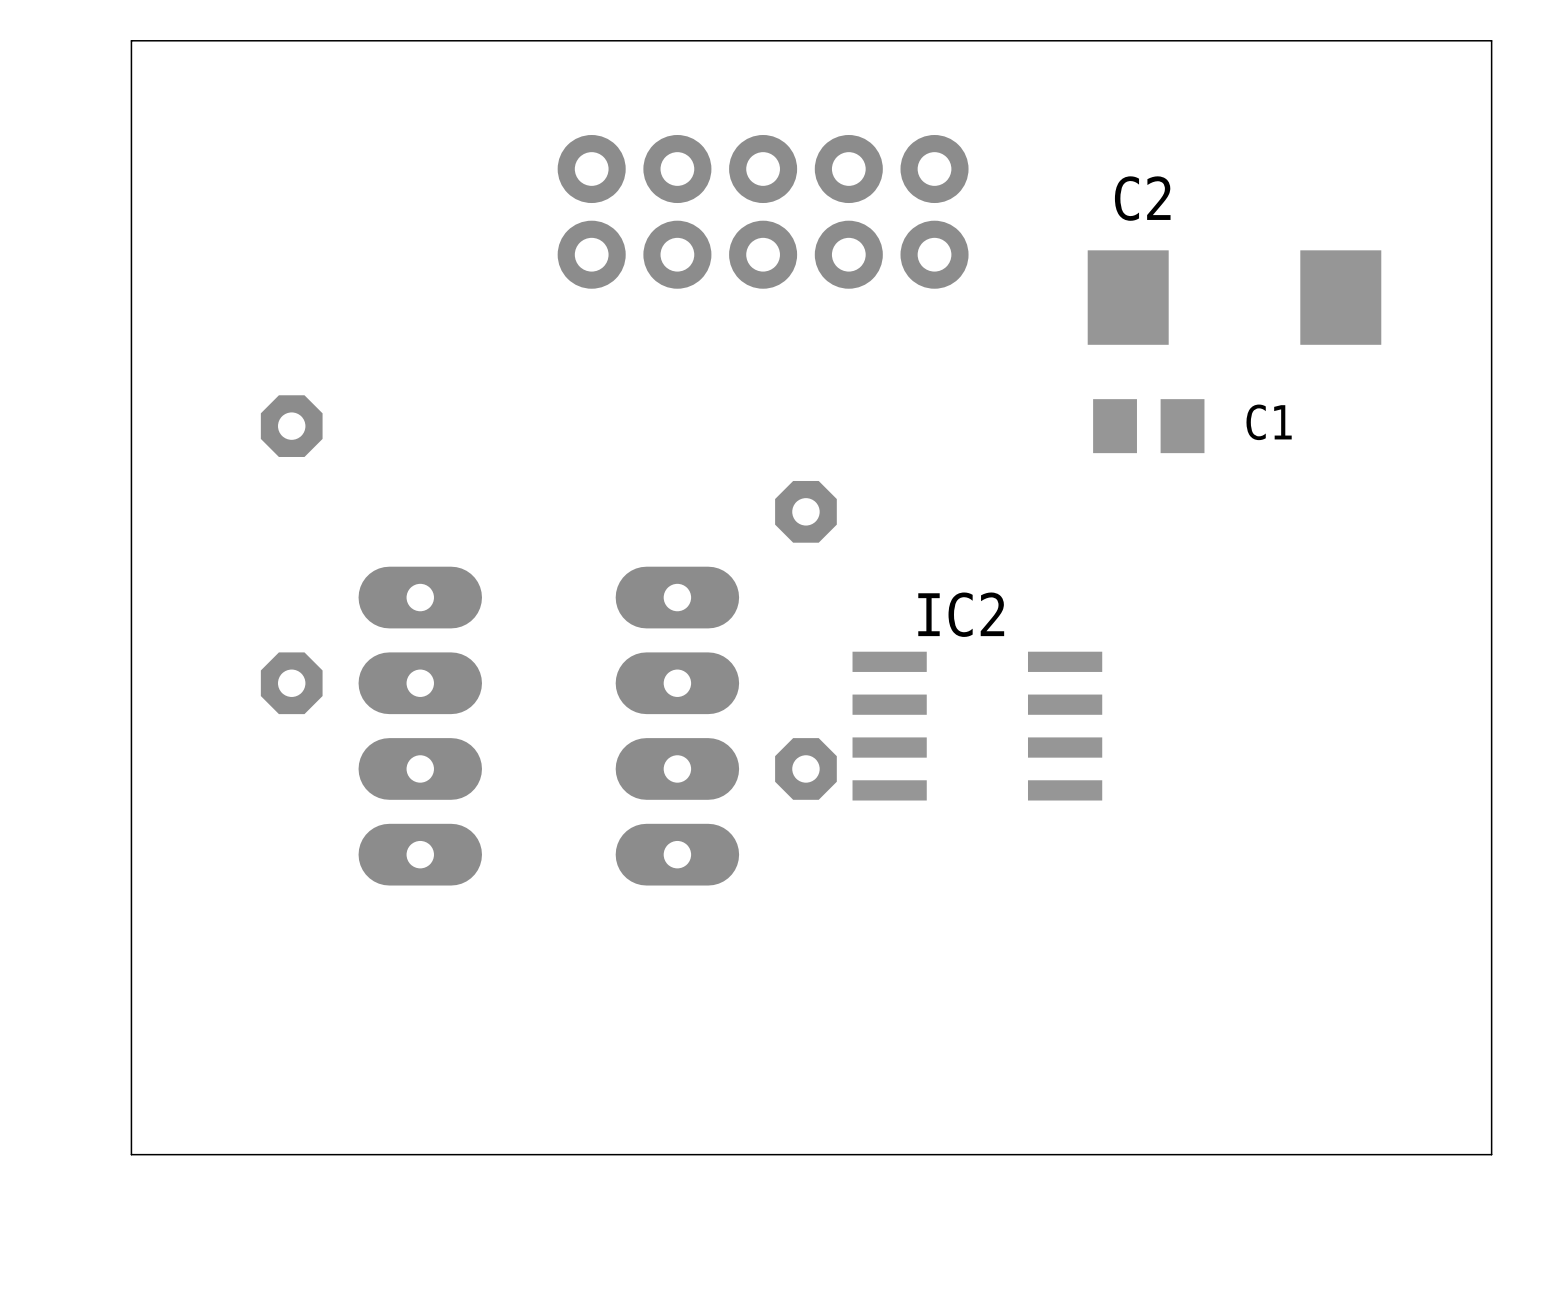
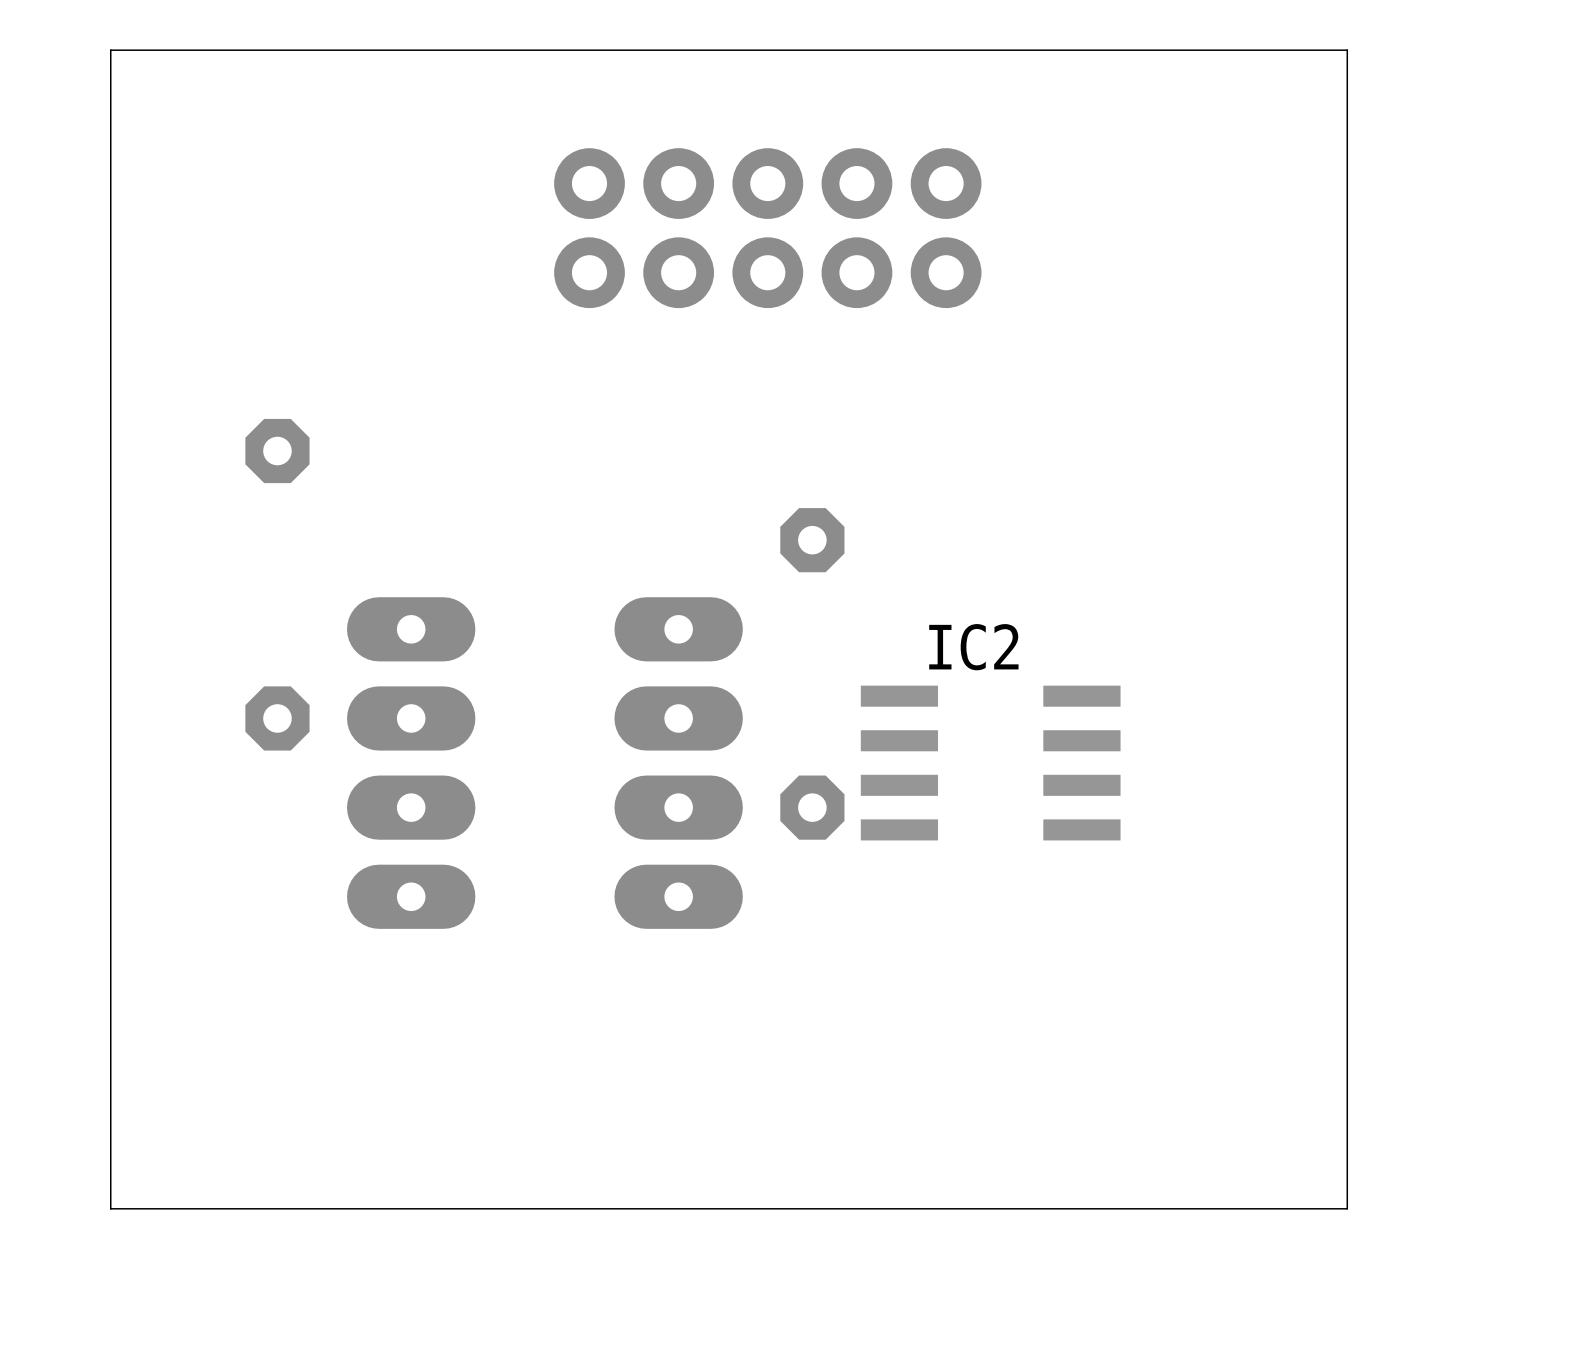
board edge: (1320, 40) (1491, 40) (1491, 1154) (1320, 1154) -> (1347, 50) (1347, 1208)
C2: (1234, 297) -> none
C1: (1148, 426) -> none

